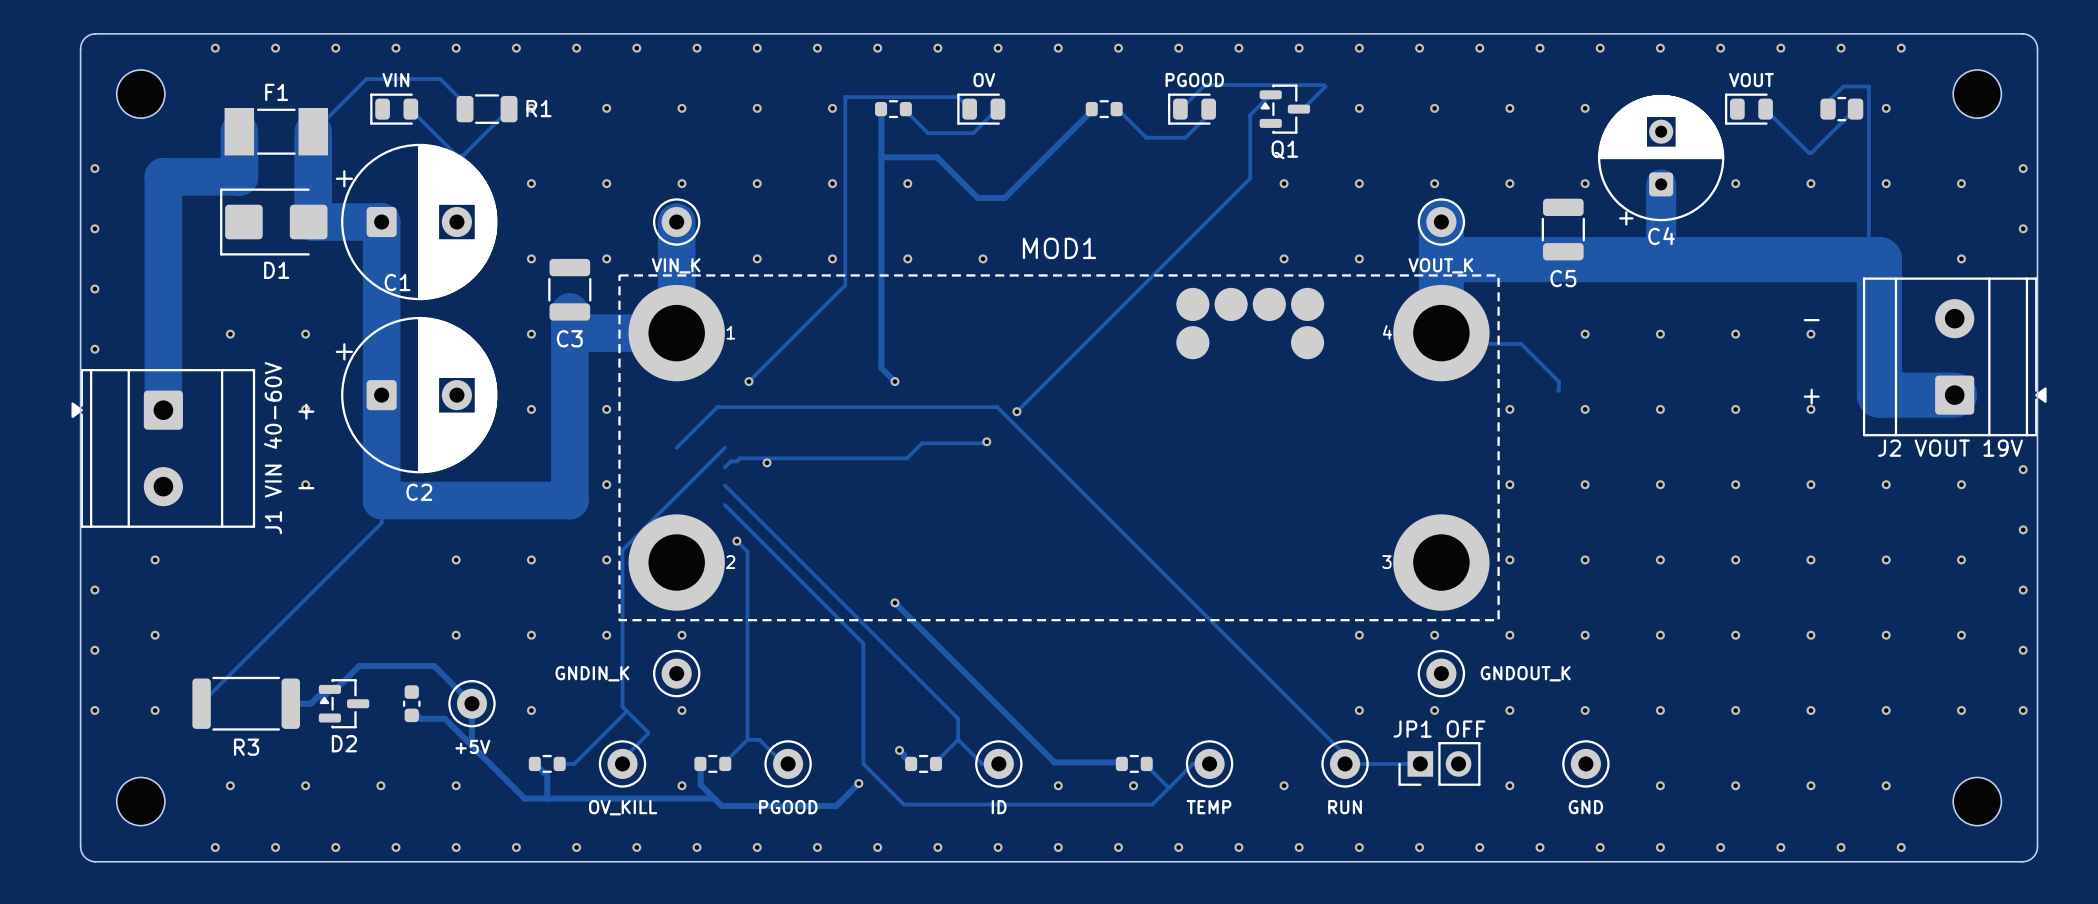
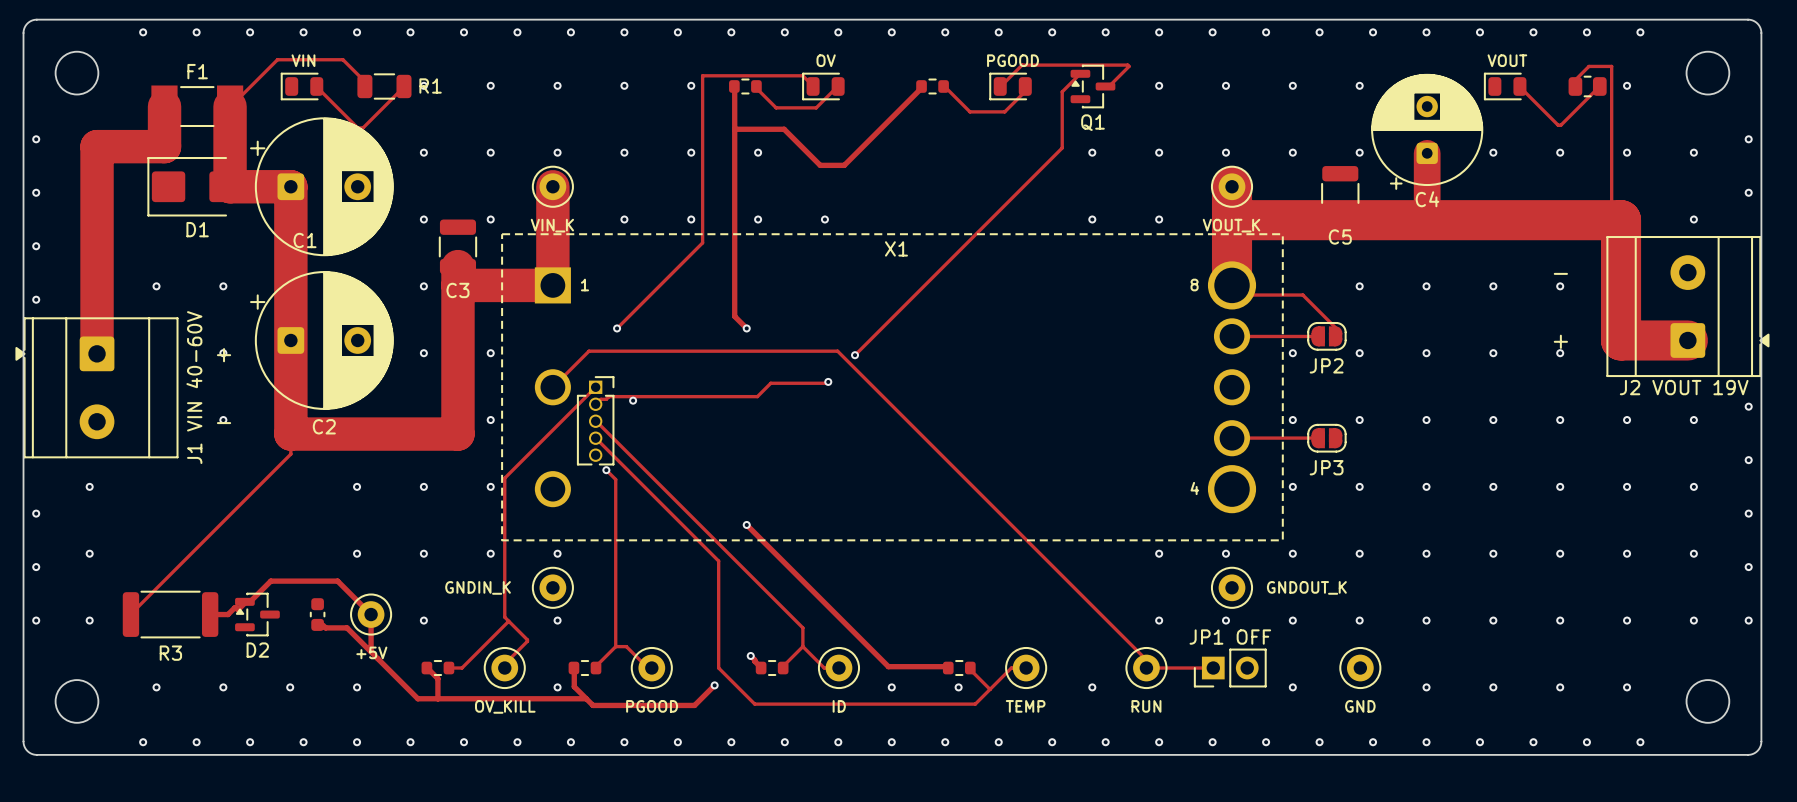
part: (1192, 304) -> none
part: (1231, 304) -> none
part: (1269, 304) -> none
part: (1307, 304) -> none
part: (676, 333) -> none
part: (1441, 333) -> none
part: (1192, 342) -> none
part: (1307, 342) -> none
track: none -> (1237, 336) (1317, 336)
JP2: none -> (1326, 336)
MOD1: (1059, 447) -> none
X1: none -> (892, 387)
part: none -> (595, 420)
track: none -> (1237, 438) (1317, 438)
JP3: none -> (1326, 438)
part: (676, 562) -> none
part: (1441, 562) -> none

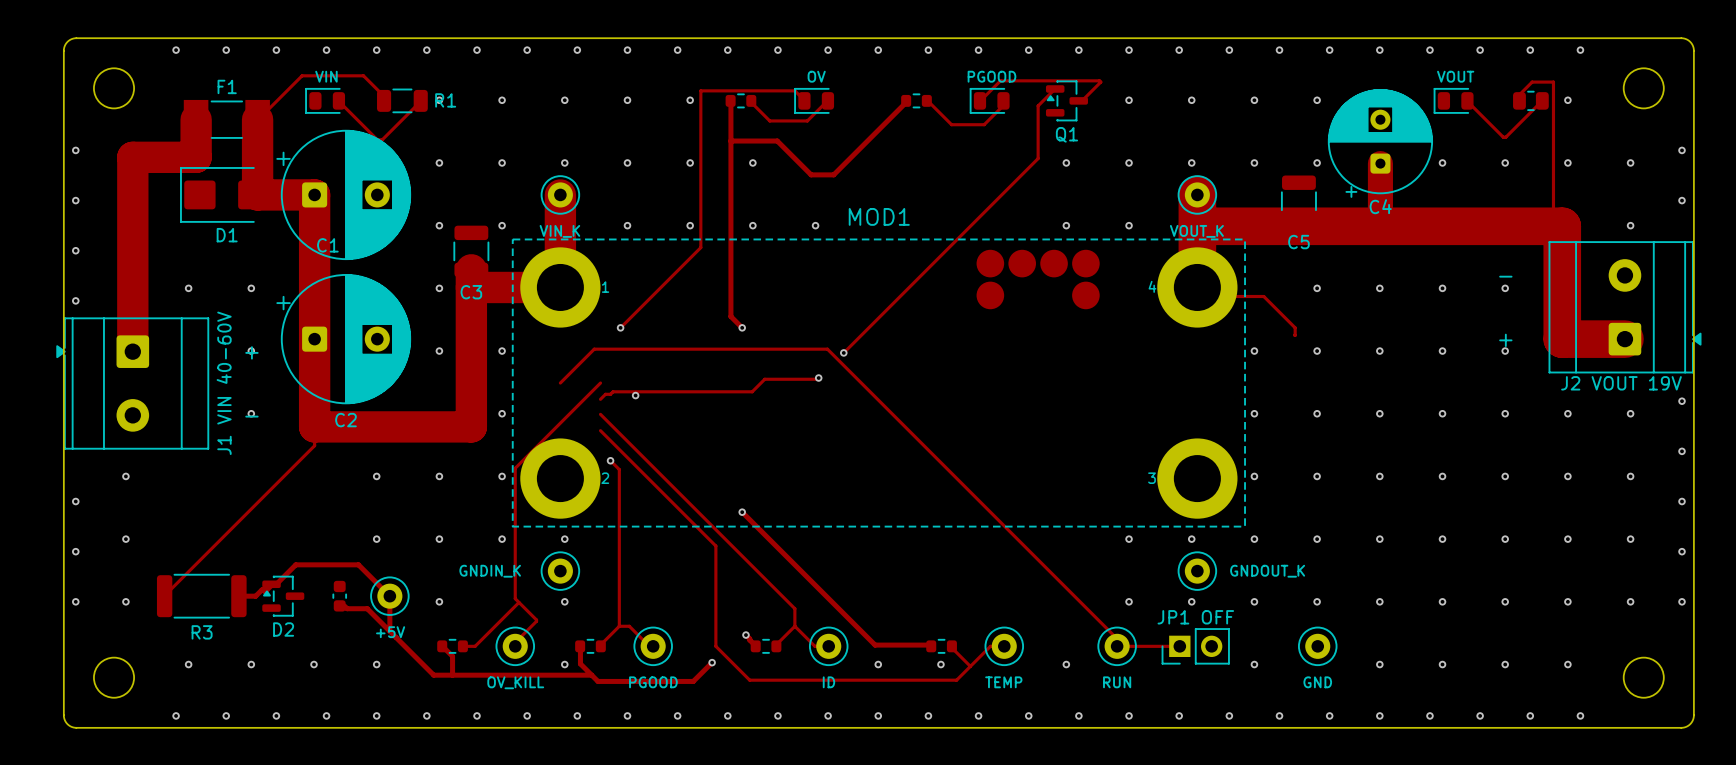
part: none -> (990, 263)
part: none -> (1022, 263)
part: none -> (1054, 263)
part: none -> (1085, 263)
part: none -> (560, 287)
part: none -> (1197, 287)
part: none -> (990, 295)
part: none -> (1085, 295)
track: (1237, 336) (1317, 336) -> none
JP2: (1326, 336) -> none
X1: (892, 387) -> none
MOD1: none -> (878, 383)
part: (595, 420) -> none
track: (1237, 438) (1317, 438) -> none
JP3: (1326, 438) -> none
part: none -> (560, 478)
part: none -> (1197, 478)

